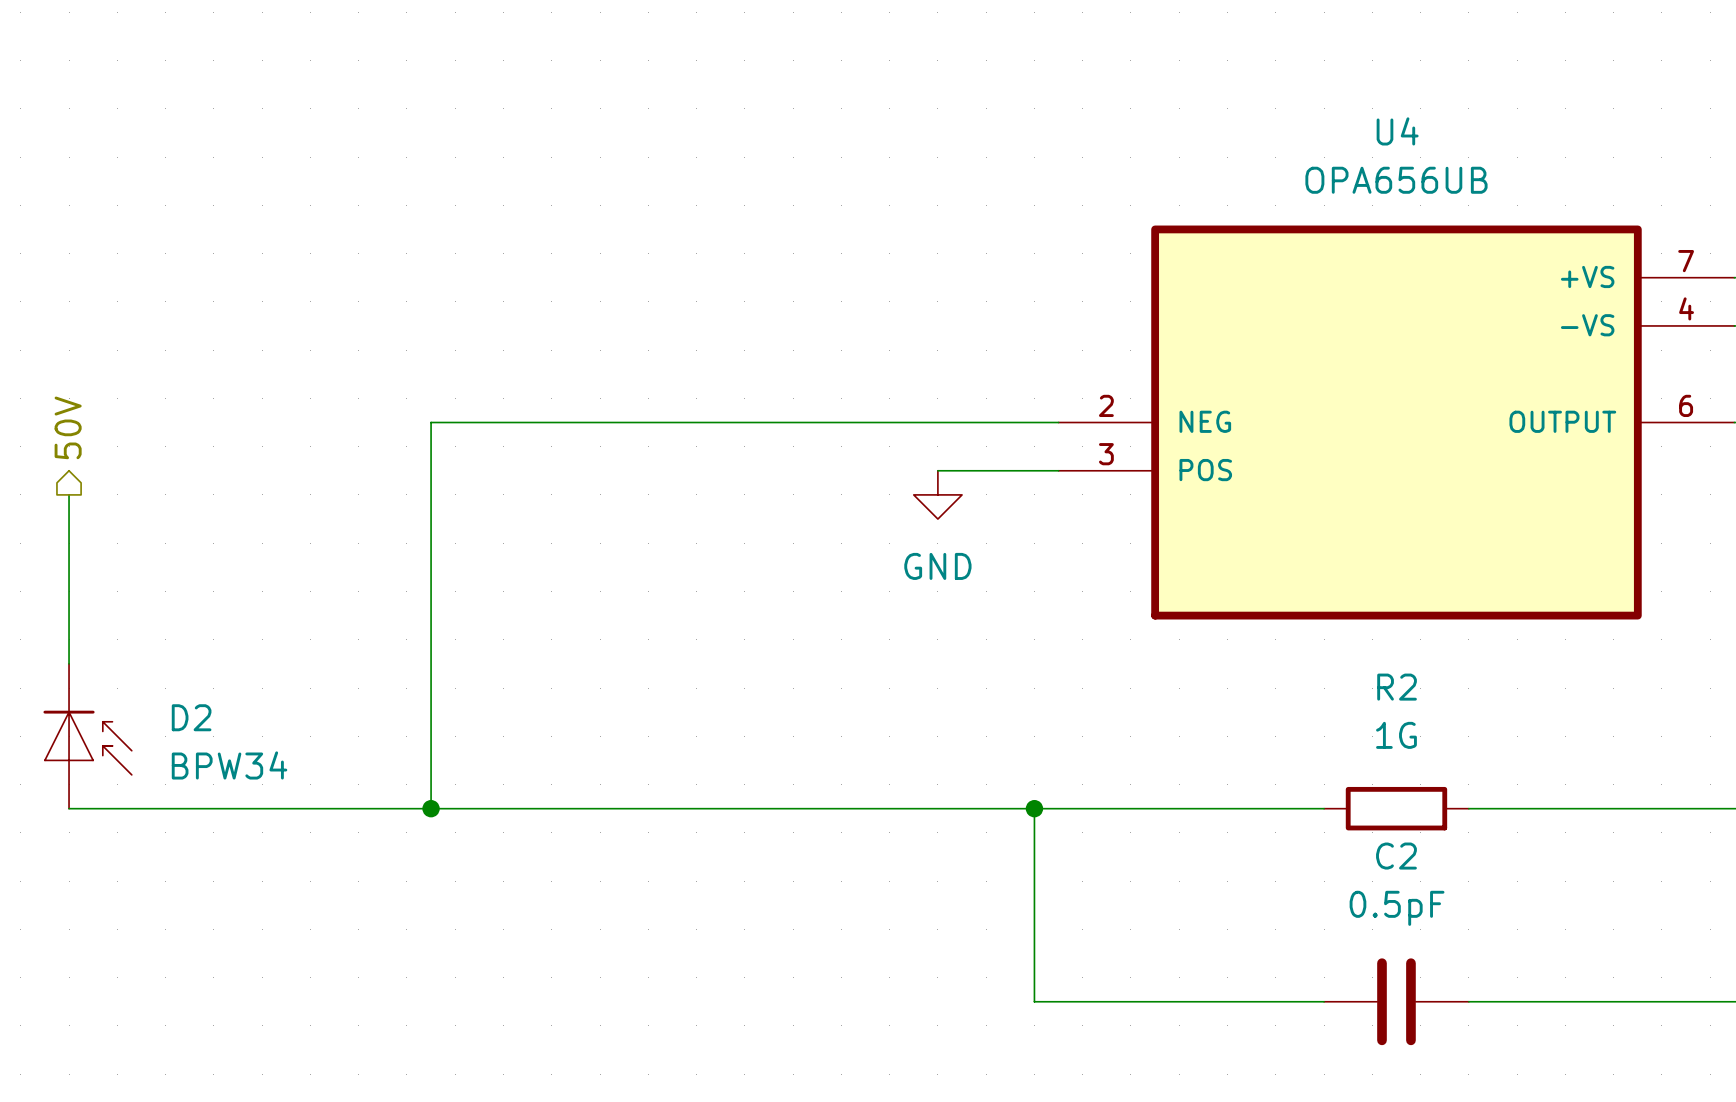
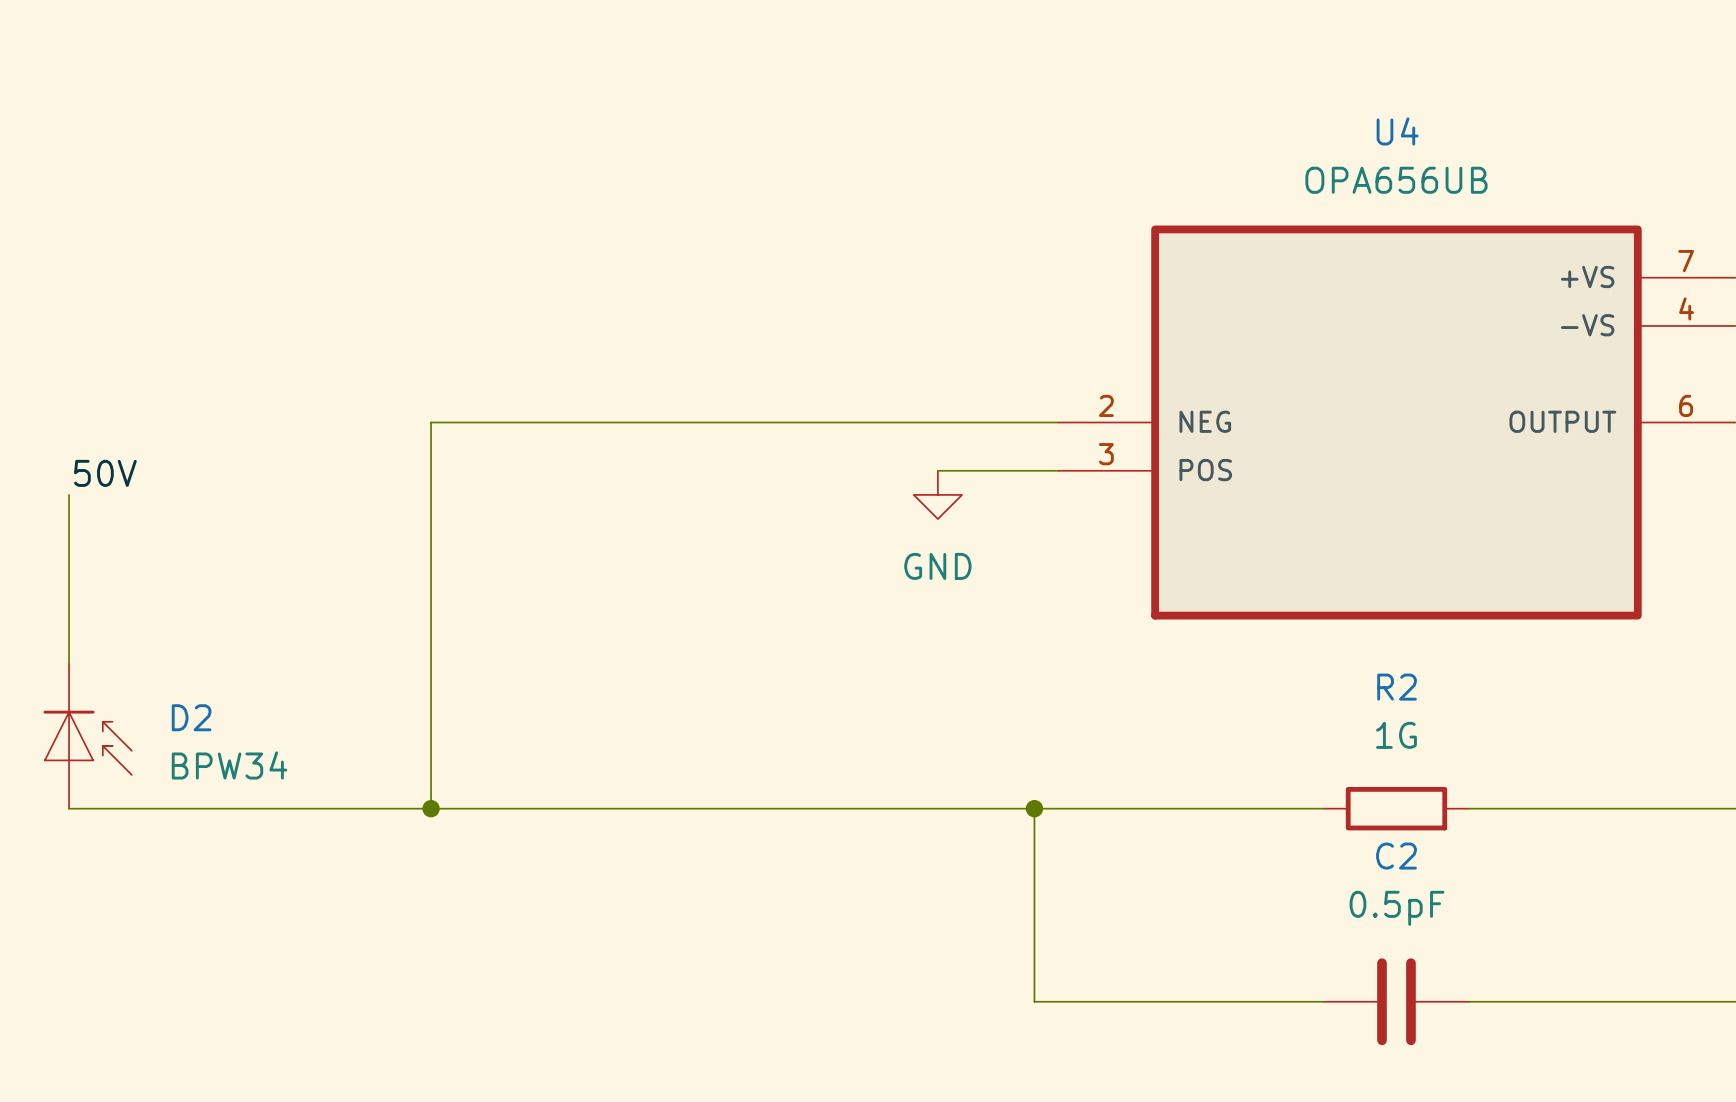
hierarchical label: 50V (68, 427) -> none
label: none -> 50V (105, 473)

